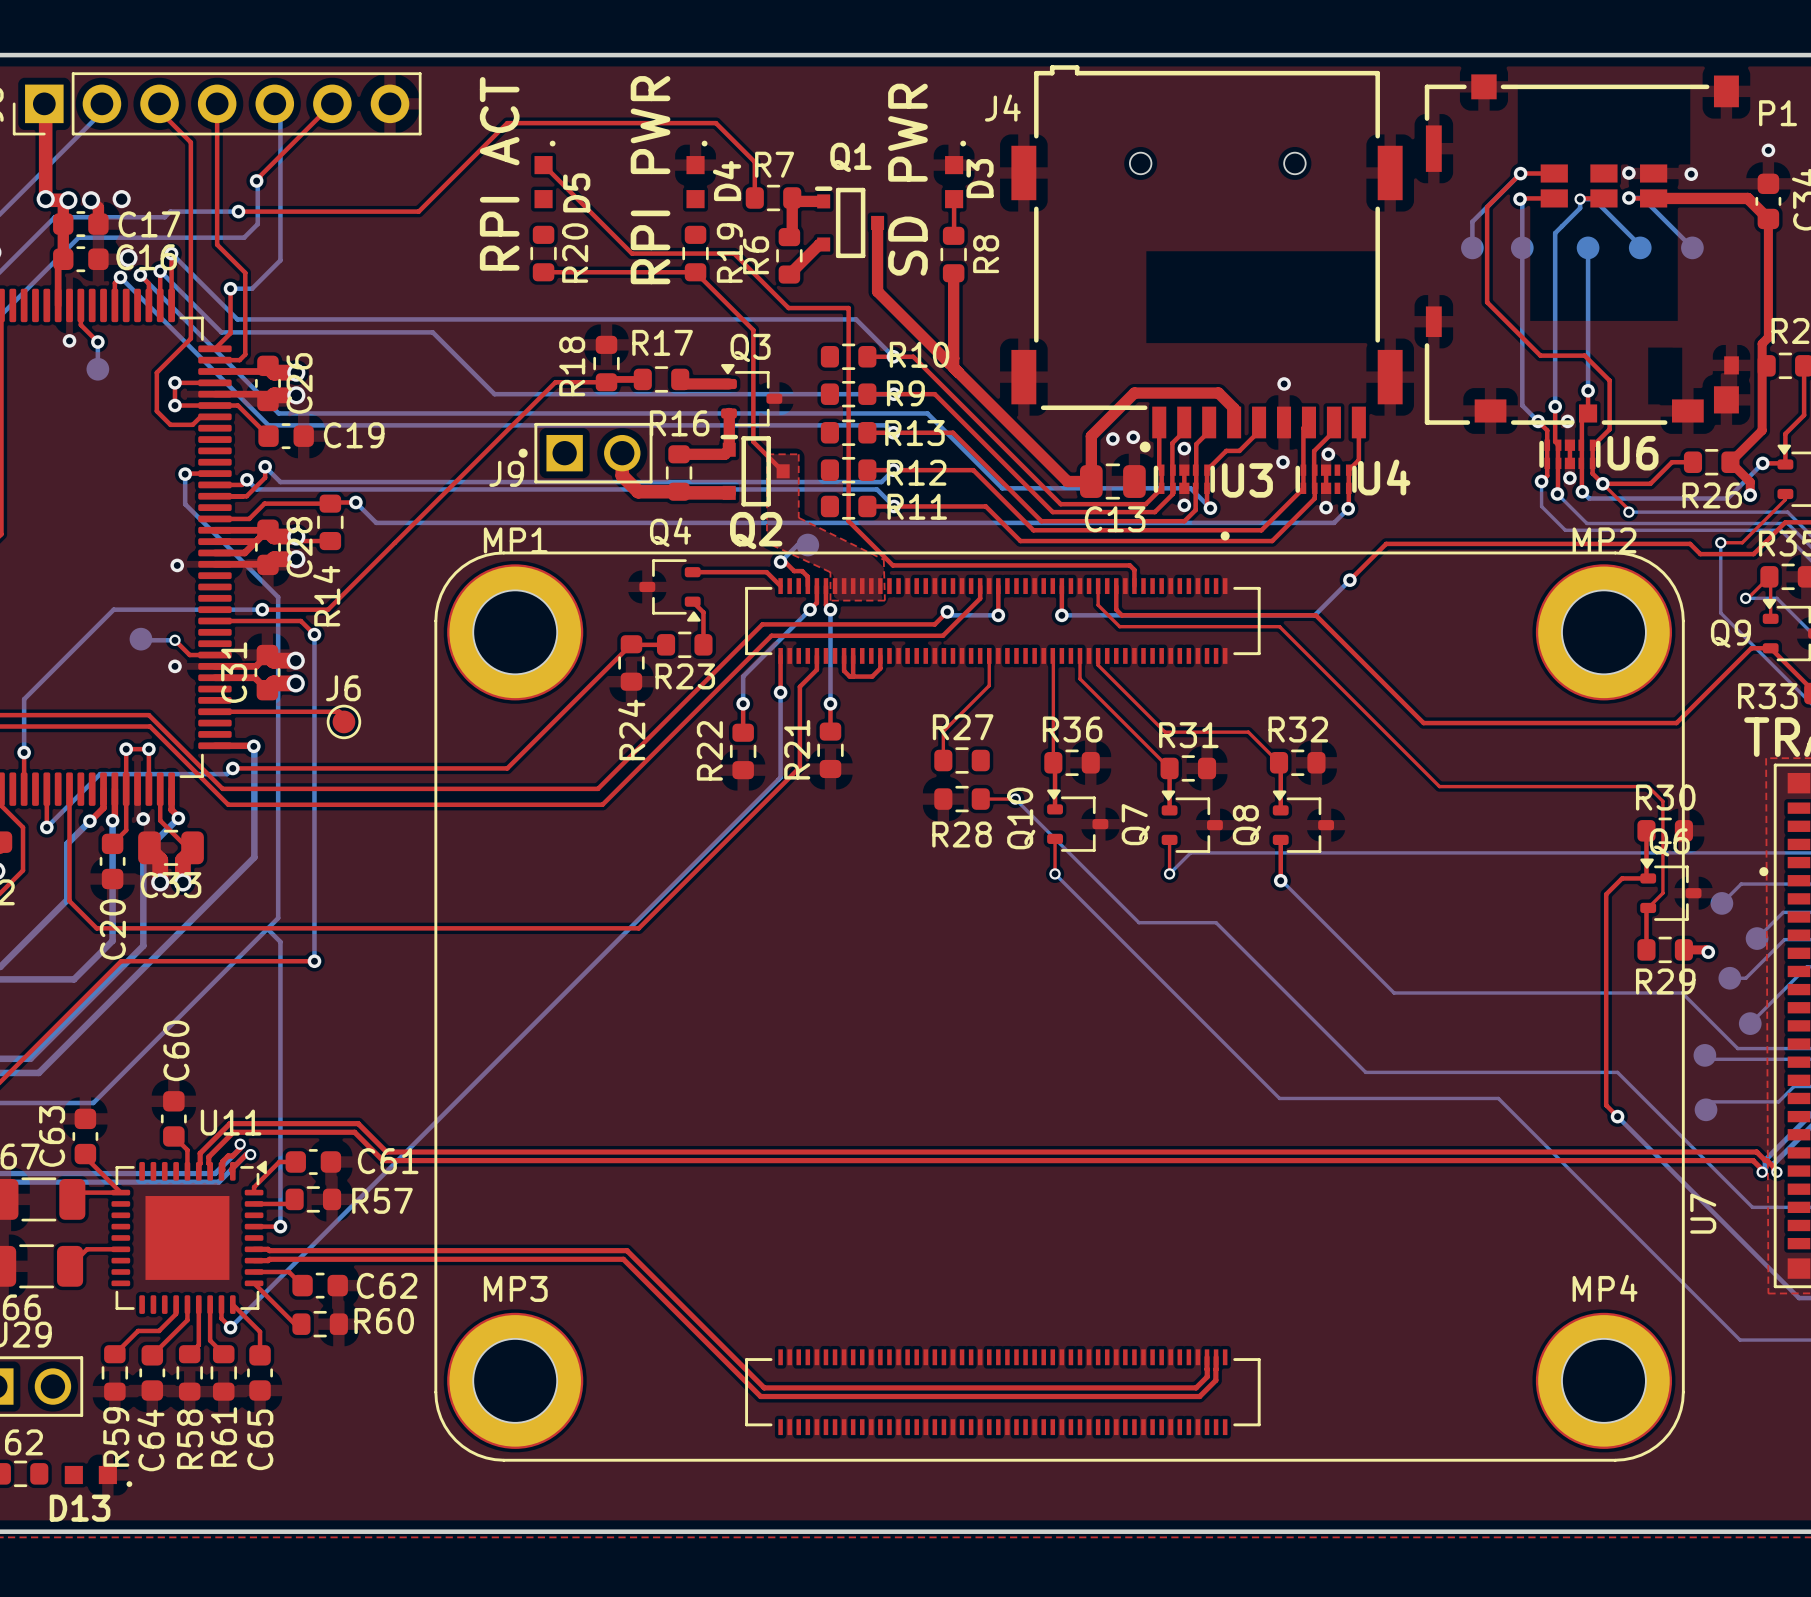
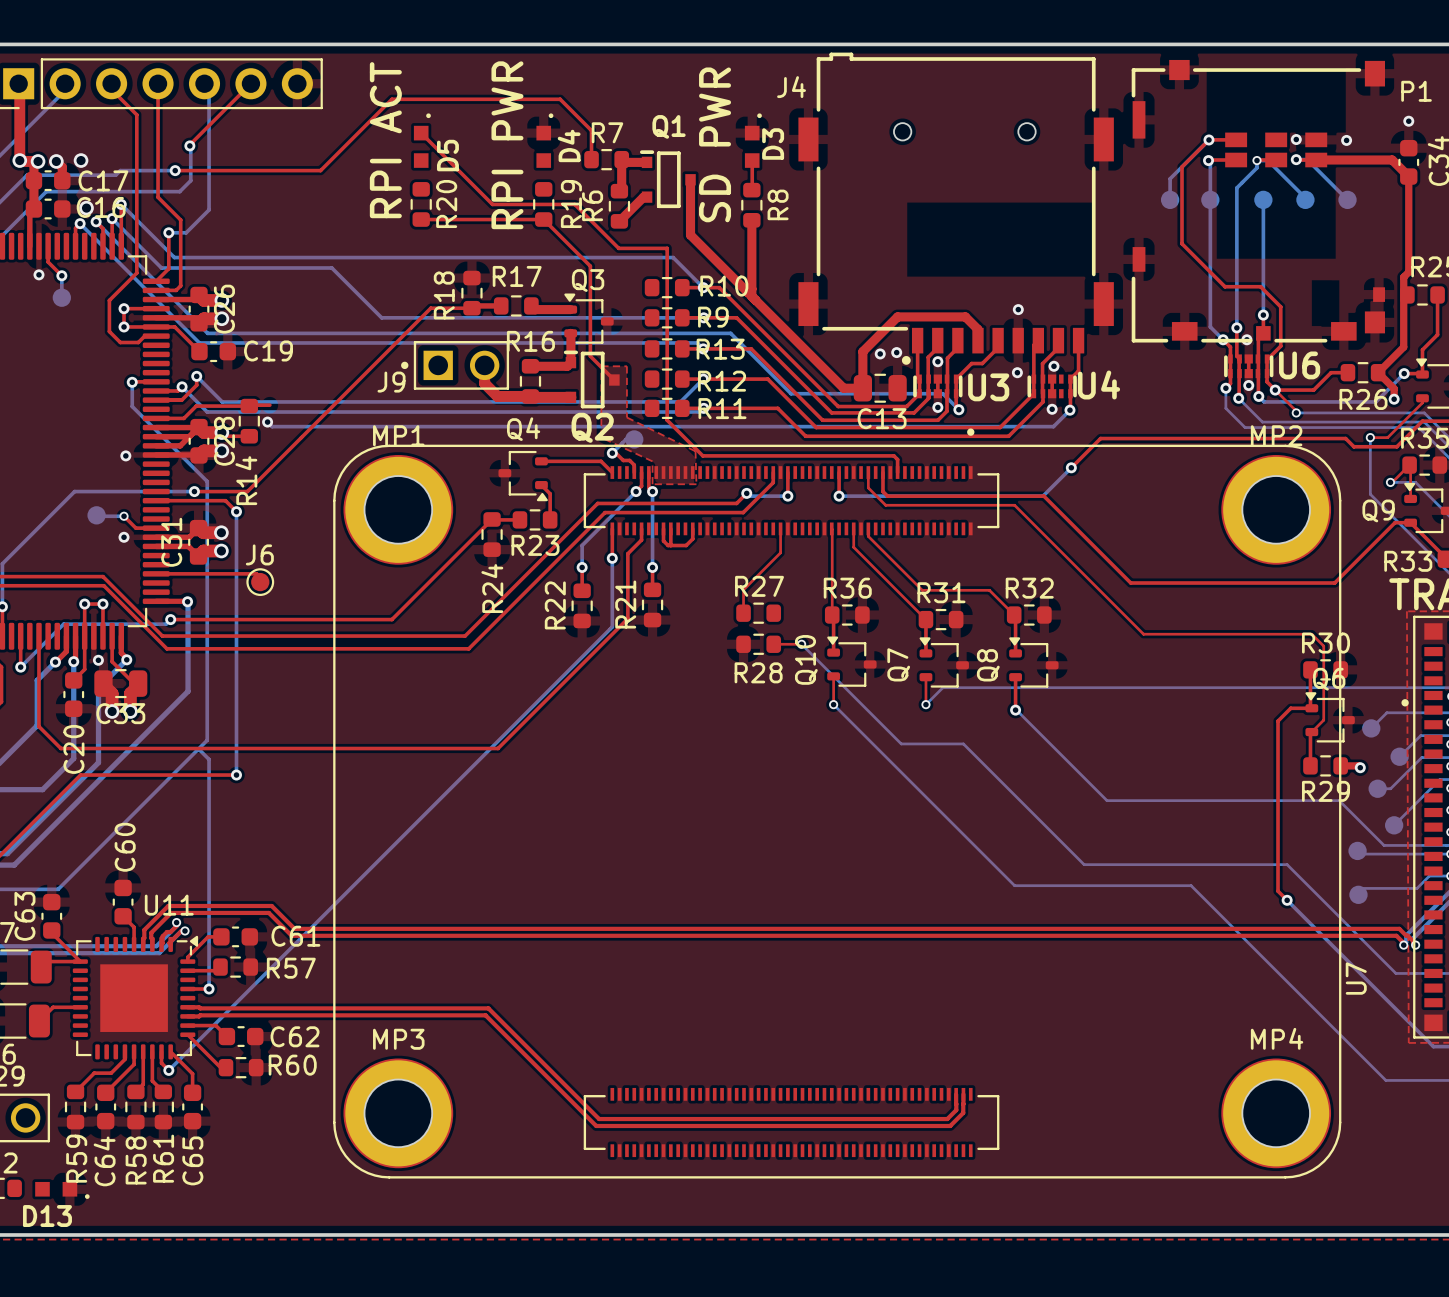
bottom track: (280, 482) (881, 482) -> (209, 388) (222, 401) (680, 401) (693, 388)
bottom track: (256, 489) (876, 489) (894, 506) -> (189, 394) (207, 412) (700, 412) (703, 408)
bottom track: (355, 502) (376, 522) (1334, 522) -> (267, 422) (272, 426) (1053, 426) (1058, 421)
via position: (355, 502) -> (267, 422)

